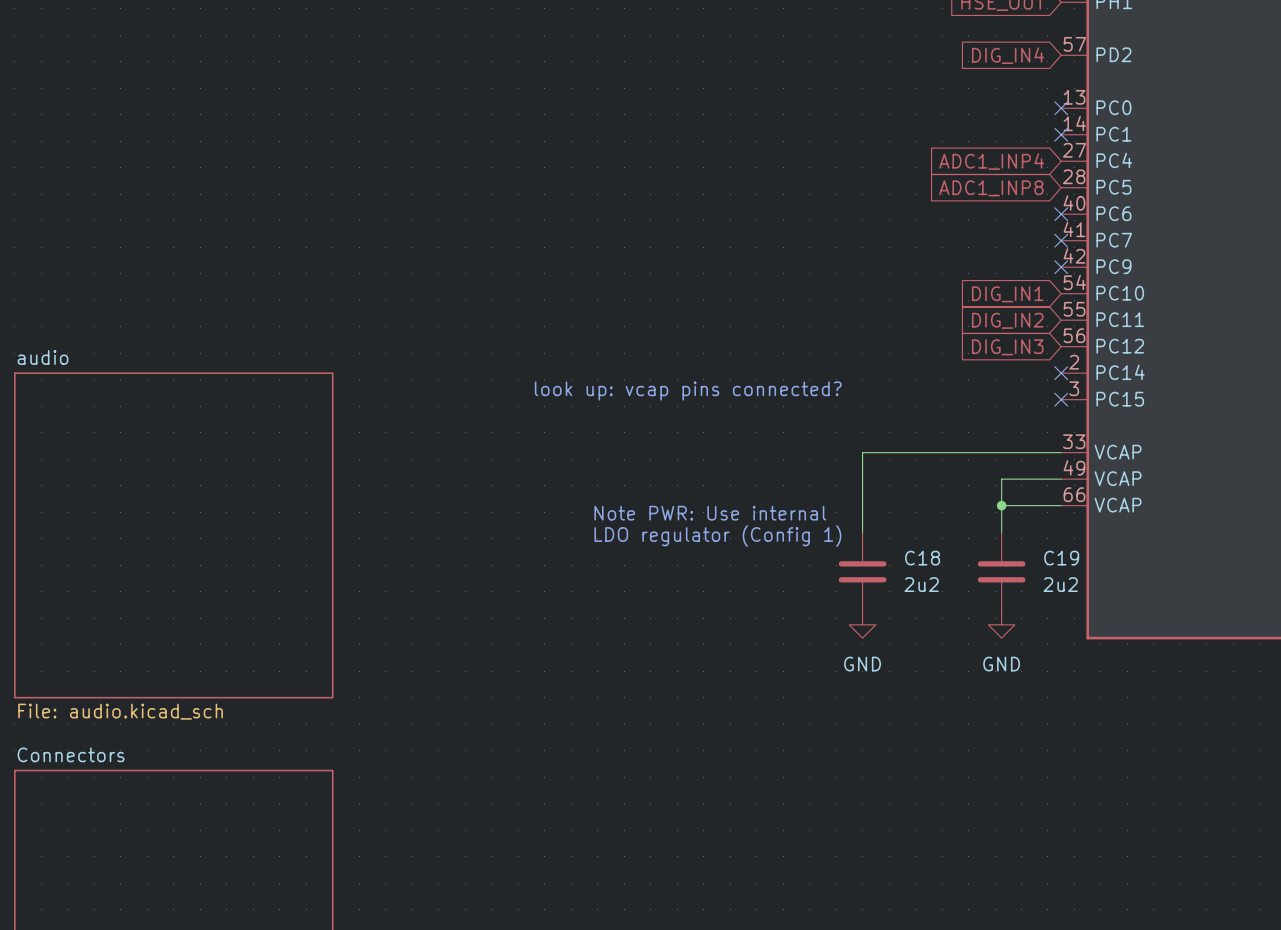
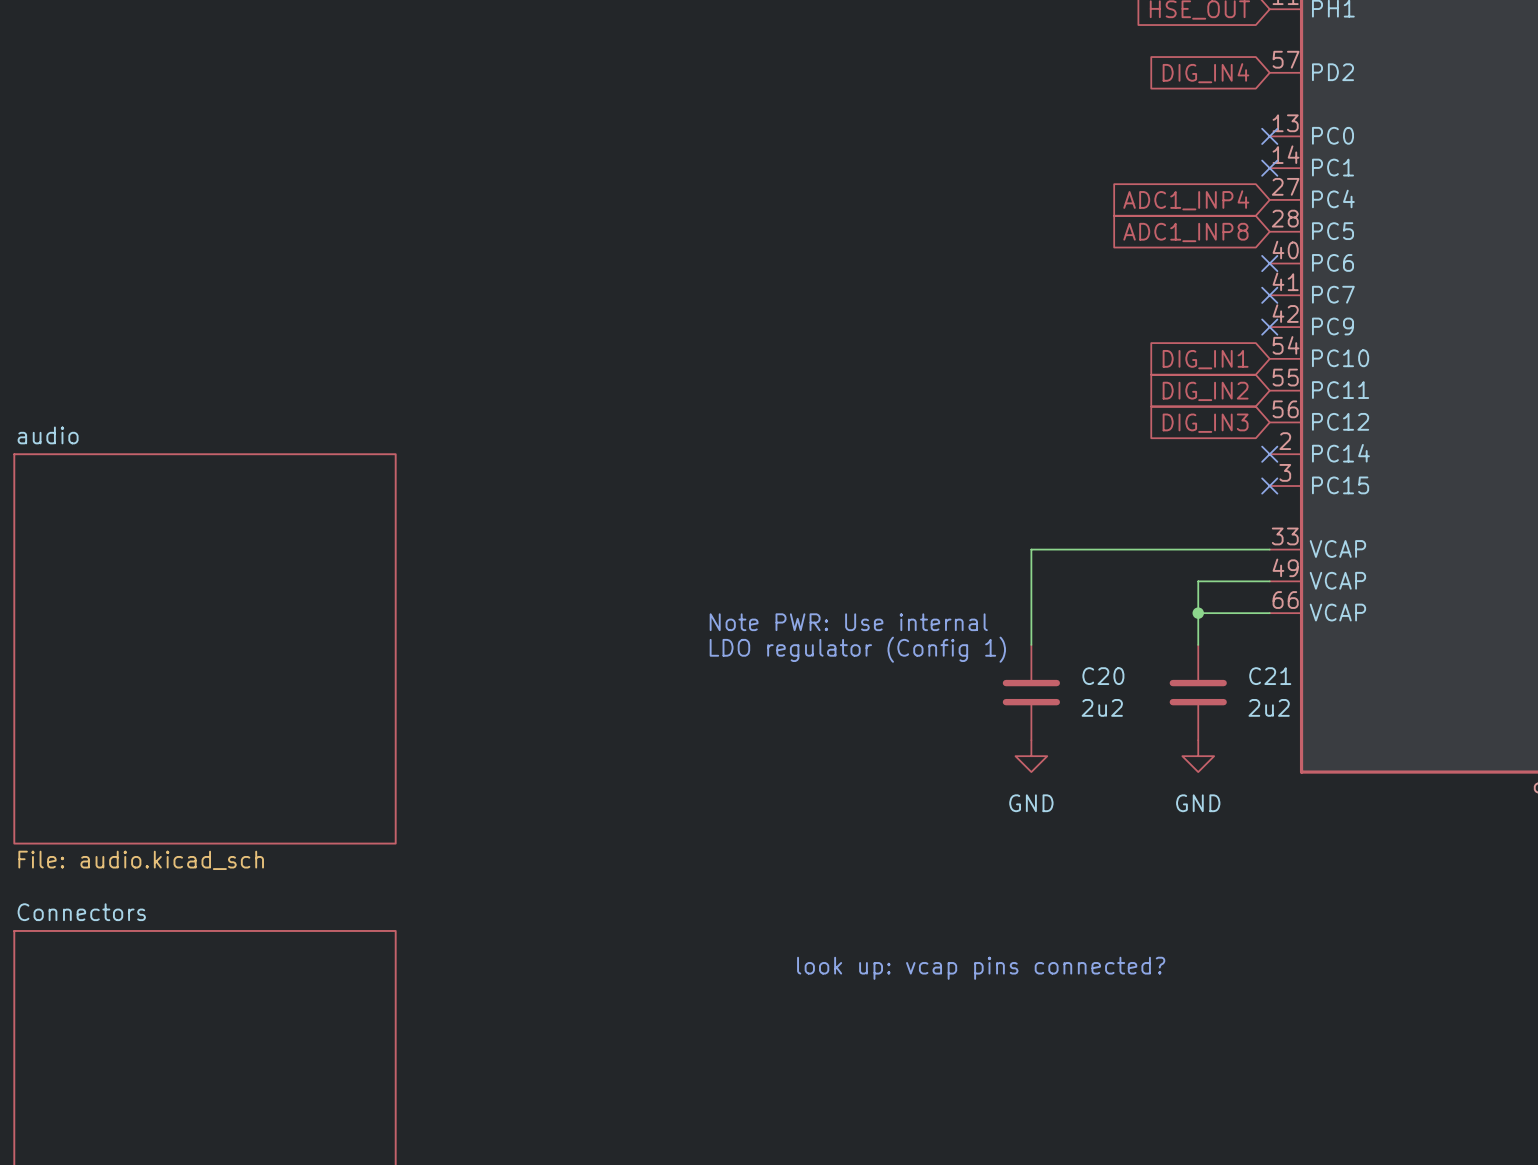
text: look up: vcap pins connected? (688, 391) -> none
C18 name: C18 (922, 558) -> C20 (1103, 676)
C19 name: C19 (1061, 558) -> C21 (1270, 676)
text: none -> look up: vcap pins connected? (981, 968)

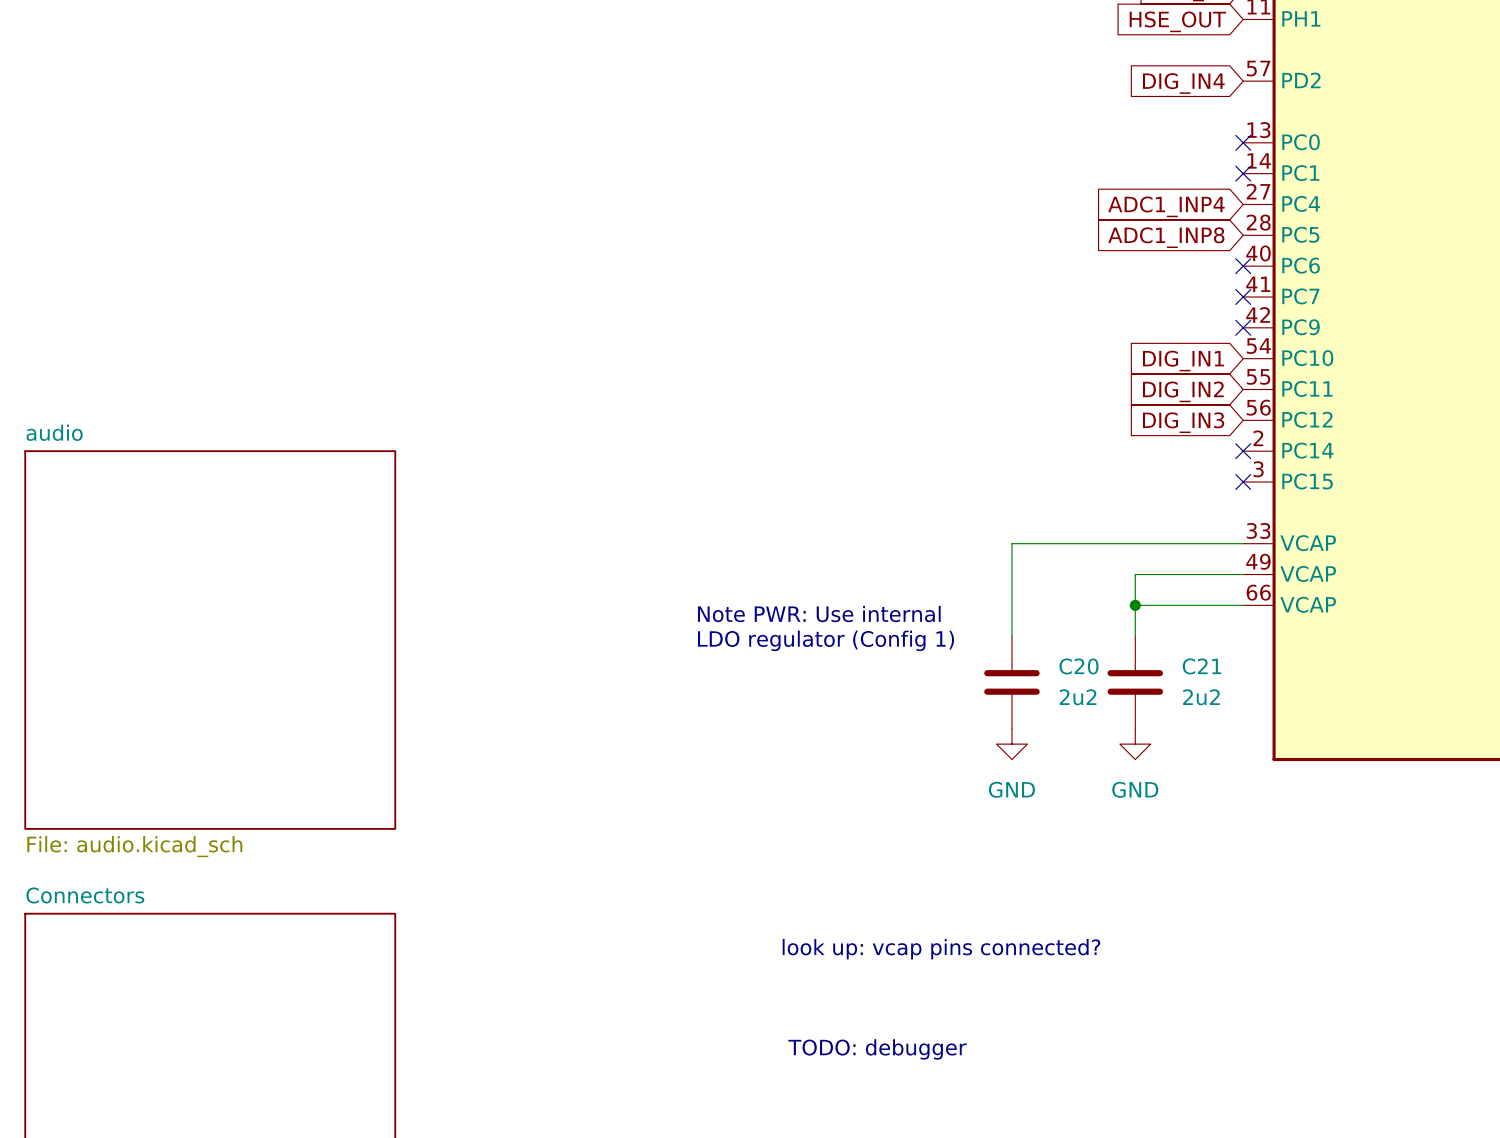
wire: (1198, 581) (1198, 644) -> (1173, 574) (1135, 574) (1135, 636)
wire: none -> (1135, 605) (1173, 605)
junction position: (1198, 613) -> (1135, 605)
C21 position: (1198, 692) -> (1135, 682)
power symbol position: GND (1198, 756) -> GND (1135, 744)
text: none -> TODO: debugger (877, 1049)

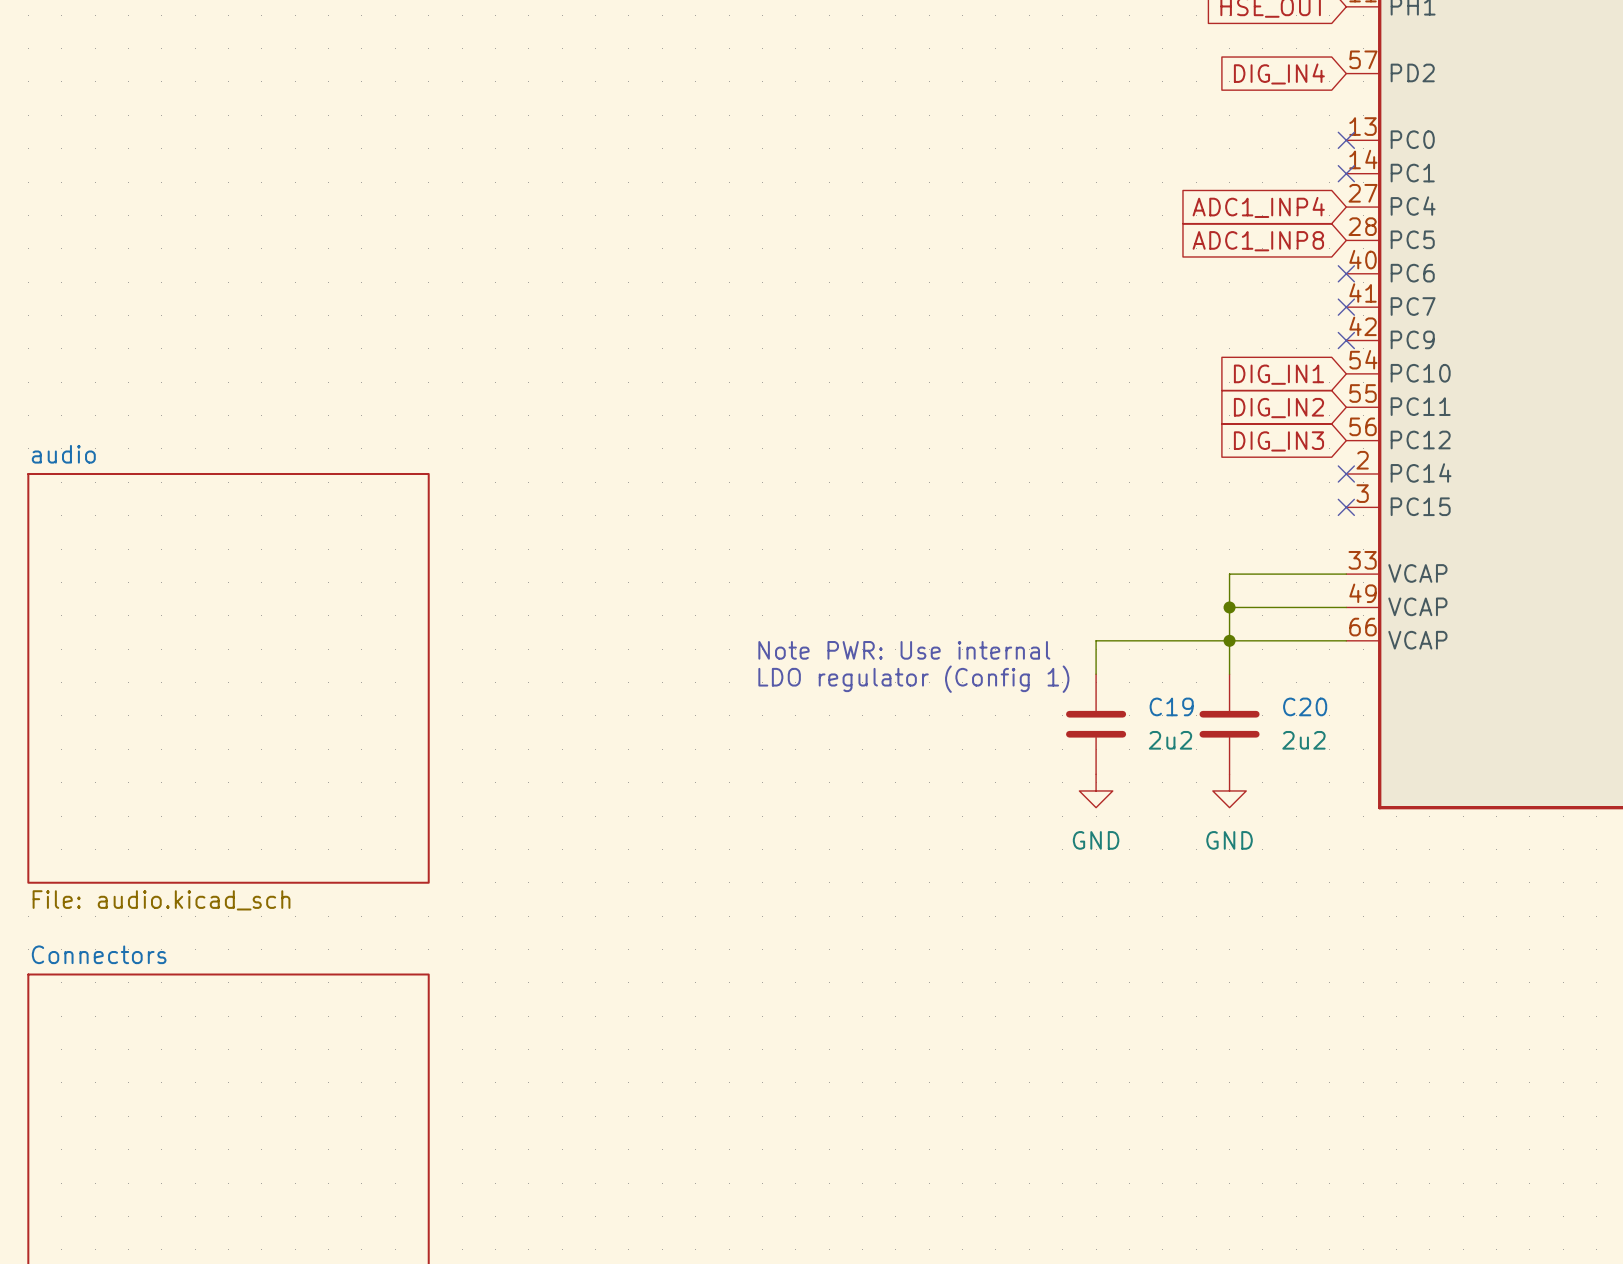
wire: (1135, 543) (1011, 543) (1011, 605) -> (1229, 640) (1096, 640)
wire: none -> (1229, 574) (1229, 607)
junction: none -> (1229, 607)
C20 name: C20 (1078, 666) -> C19 (1171, 706)
C21 name: C21 (1202, 666) -> C20 (1305, 706)
text: look up: vcap pins connected? (941, 949) -> none
text: TODO: debugger (877, 1049) -> none

